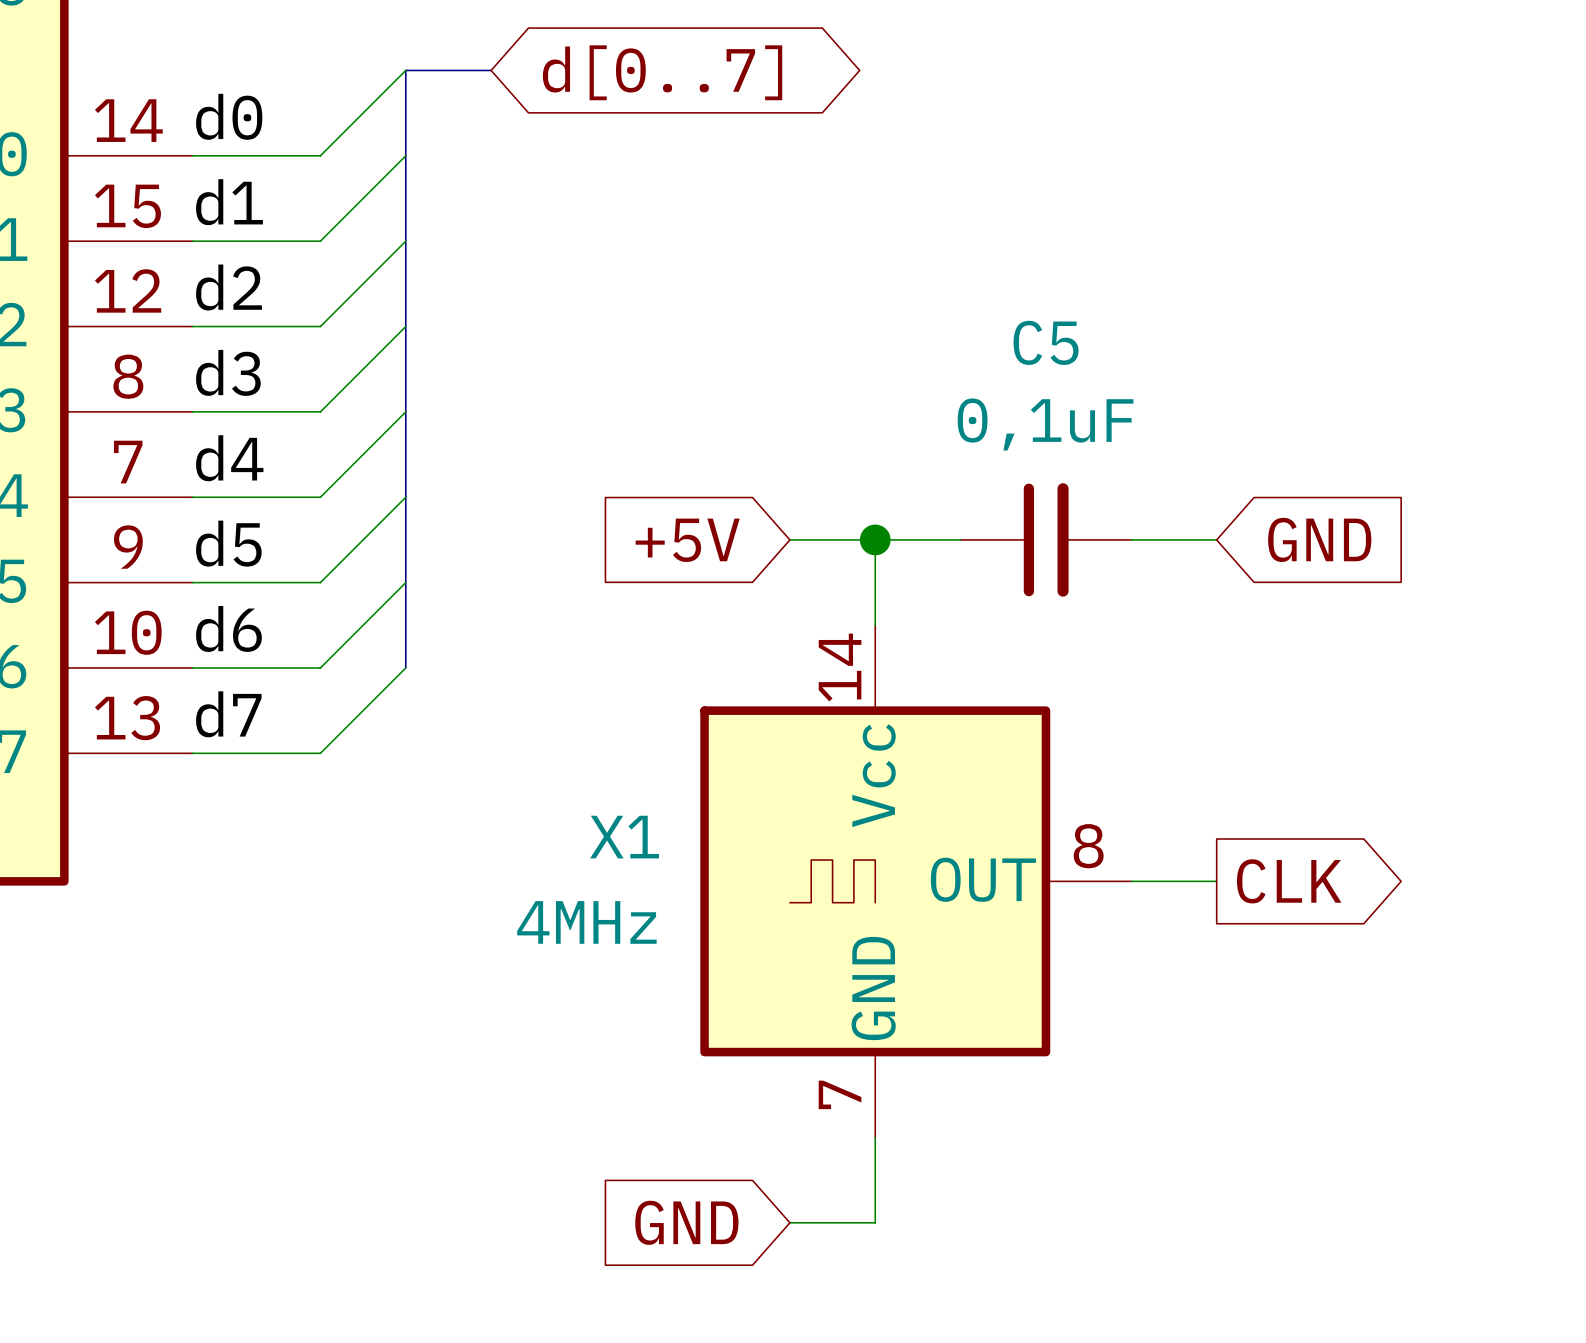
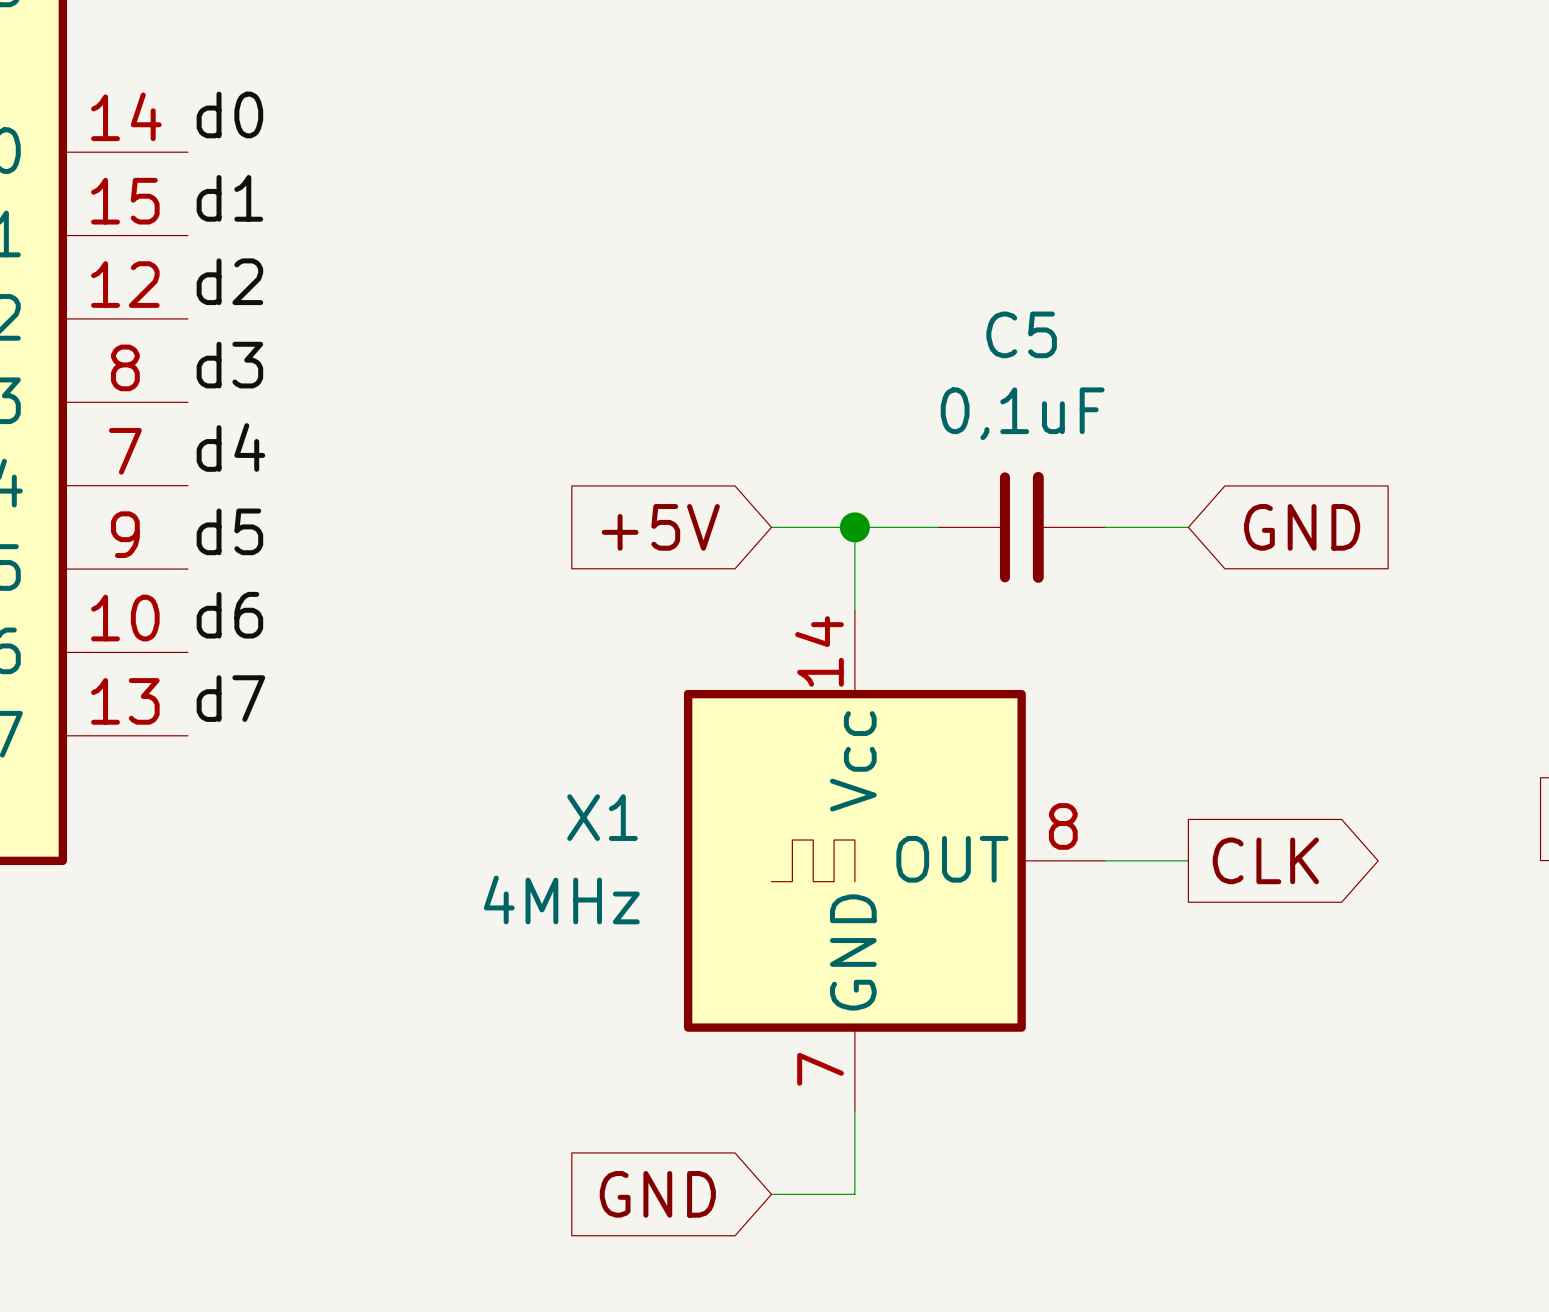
wire: (405, 70) (320, 155) (192, 155) -> none
bus: (491, 70) (405, 70) (405, 667) -> none
global label: d[0..7] (662, 72) -> none
wire: (405, 155) (320, 241) (192, 241) -> none
wire: (405, 241) (320, 326) (192, 326) -> none
wire: (405, 326) (320, 411) (192, 411) -> none
wire: (405, 411) (320, 497) (192, 497) -> none
wire: (405, 497) (320, 582) (192, 582) -> none
wire: (405, 582) (320, 667) (192, 667) -> none
wire: (405, 667) (320, 753) (192, 753) -> none

